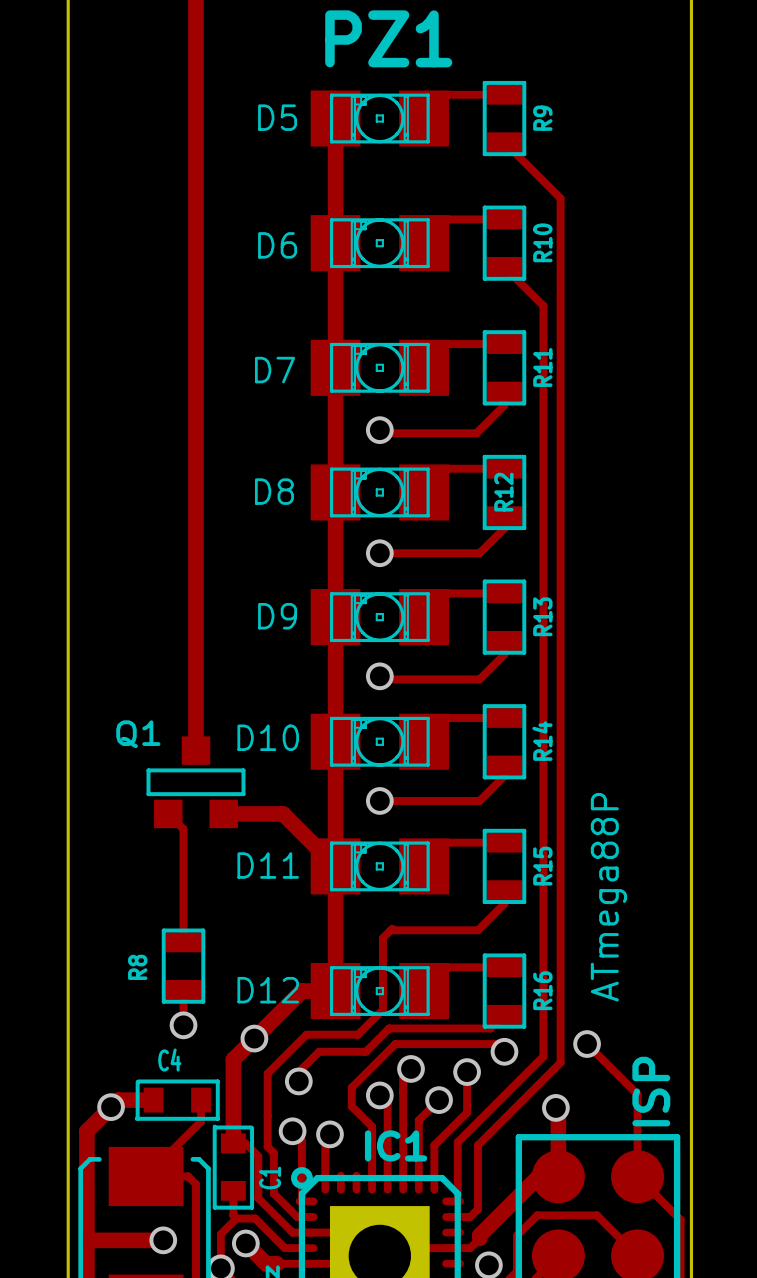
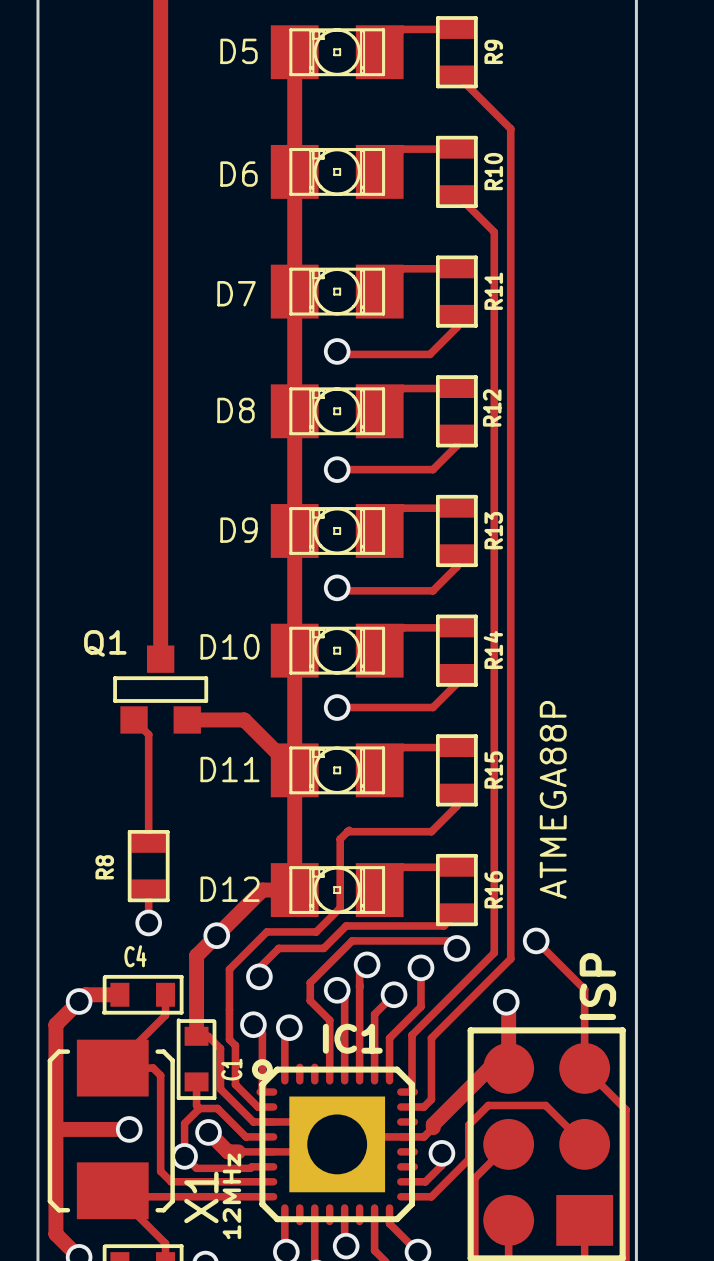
R12 name position: R12 (503, 492) -> R12 (492, 407)
IC1 value: ATmega88P (608, 897) -> ATMEGA88P (553, 799)

